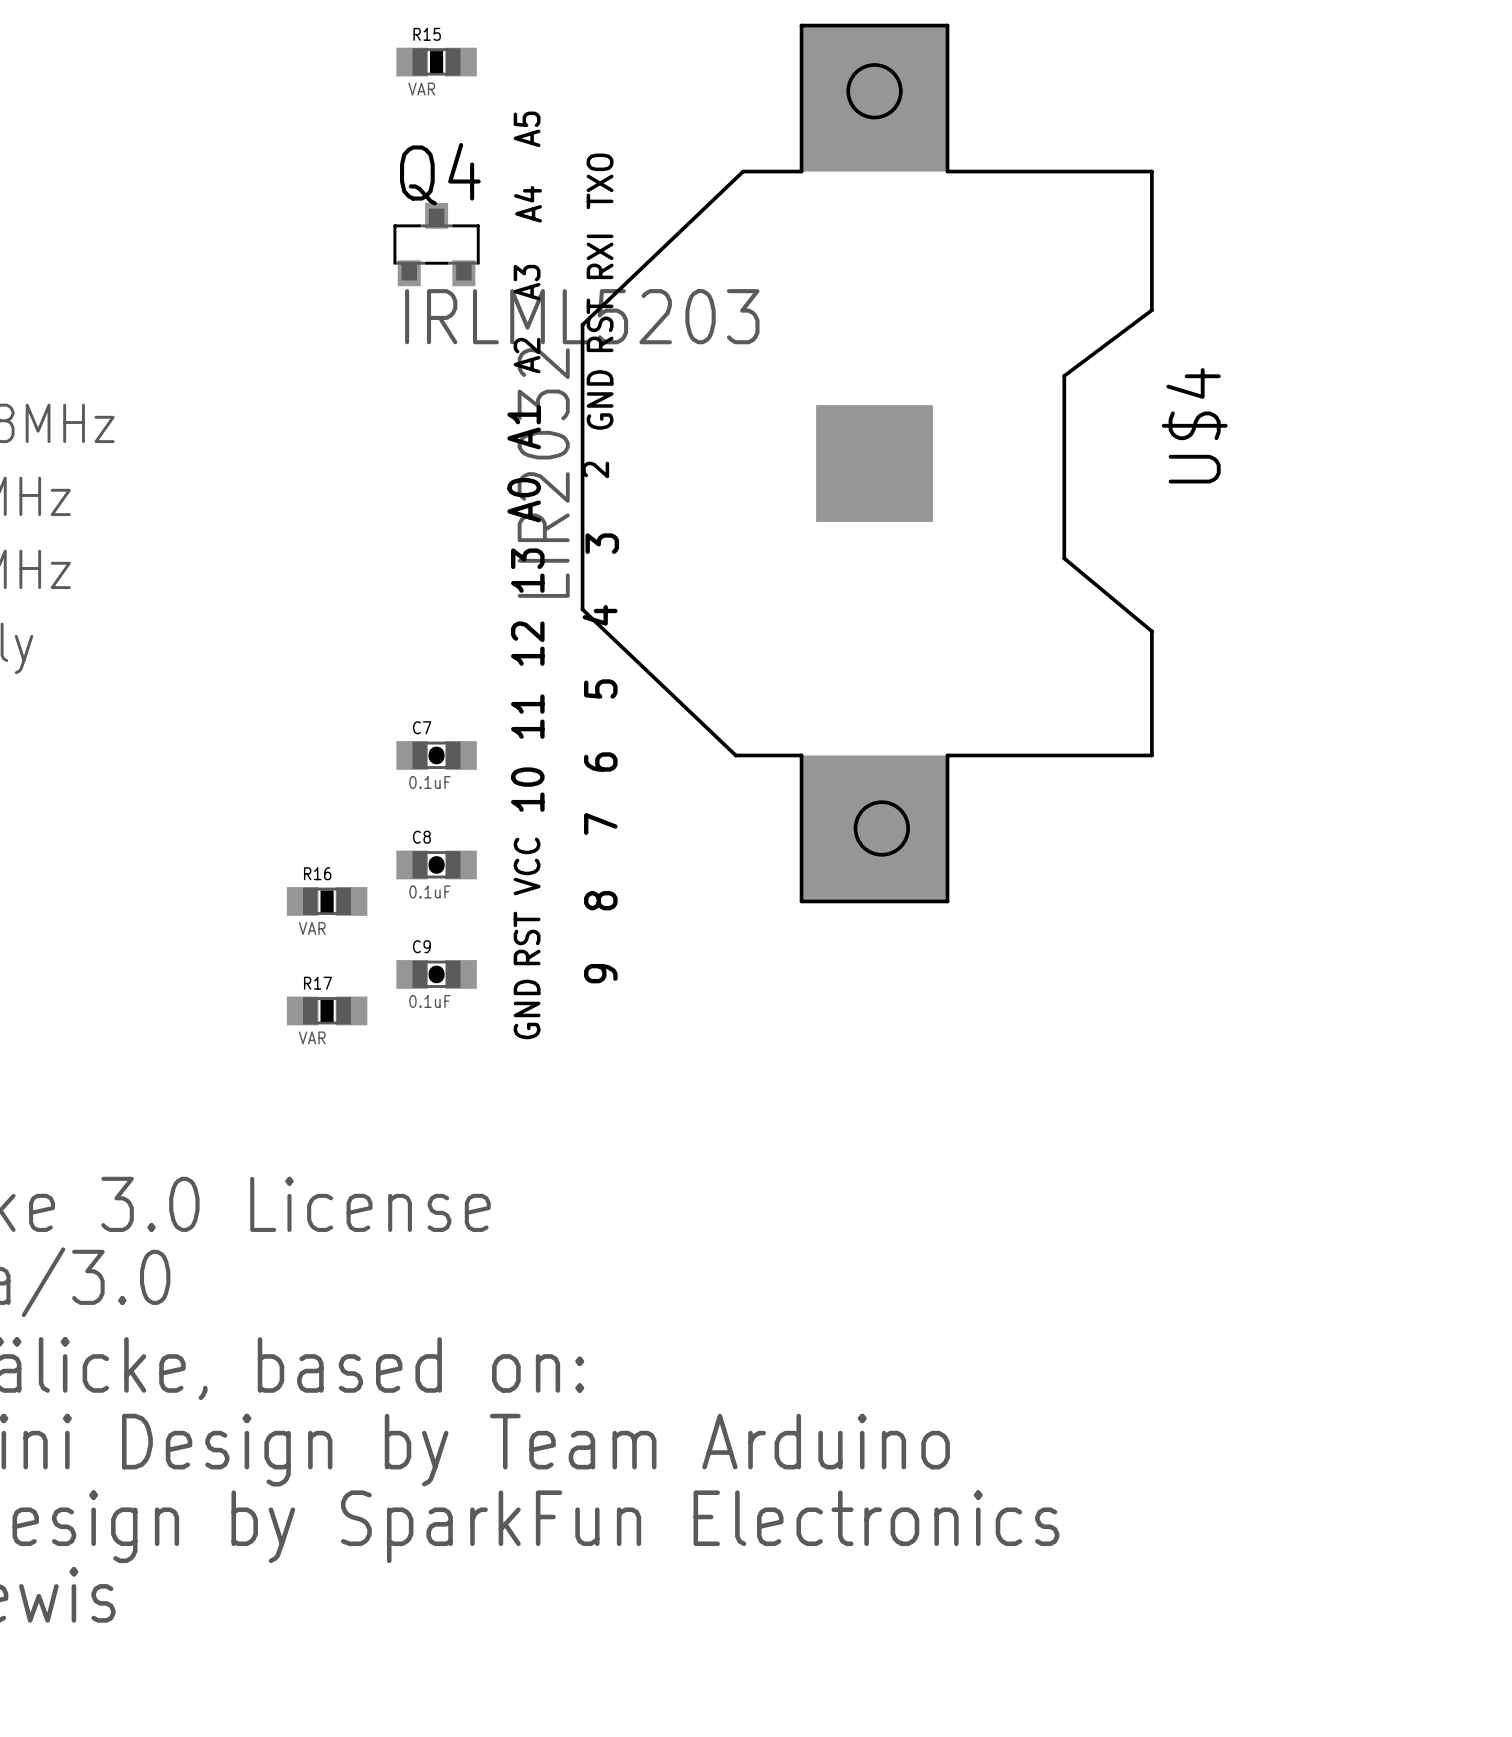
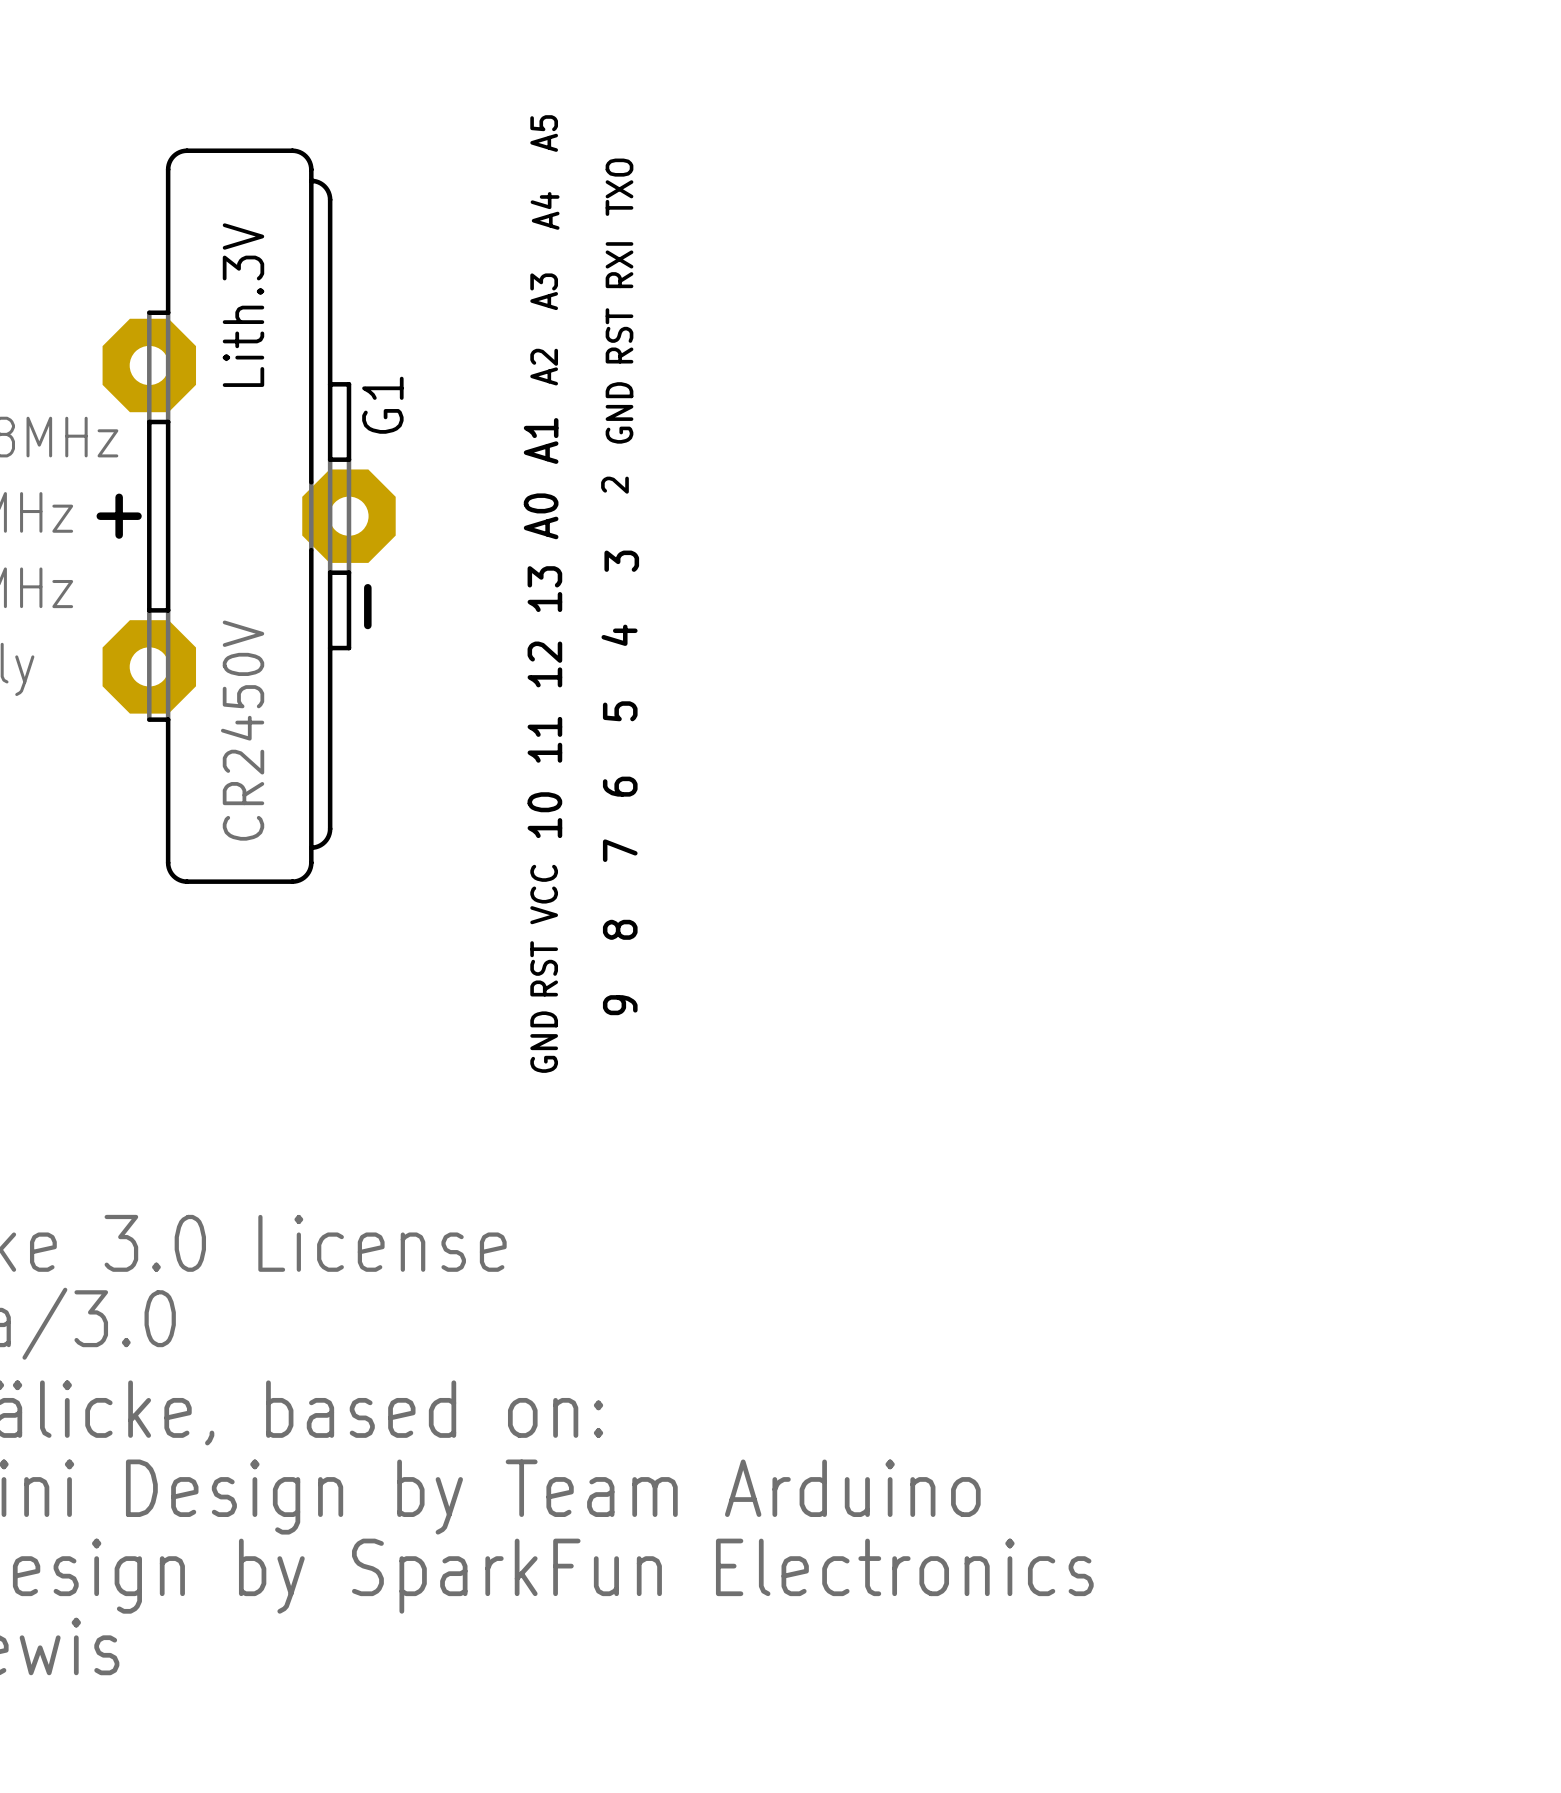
R15: VAR (436, 62) -> none
Q4: IRLML5203 (436, 244) -> none
U$4: LIR2032 (867, 463) -> none
G1: none -> CR2450V (246, 516)
C7: 0.1uF (436, 755) -> none
C8: 0.1uF (436, 864) -> none
R16: VAR (327, 901) -> none
C9: 0.1uF (436, 974) -> none
R17: VAR (327, 1010) -> none

